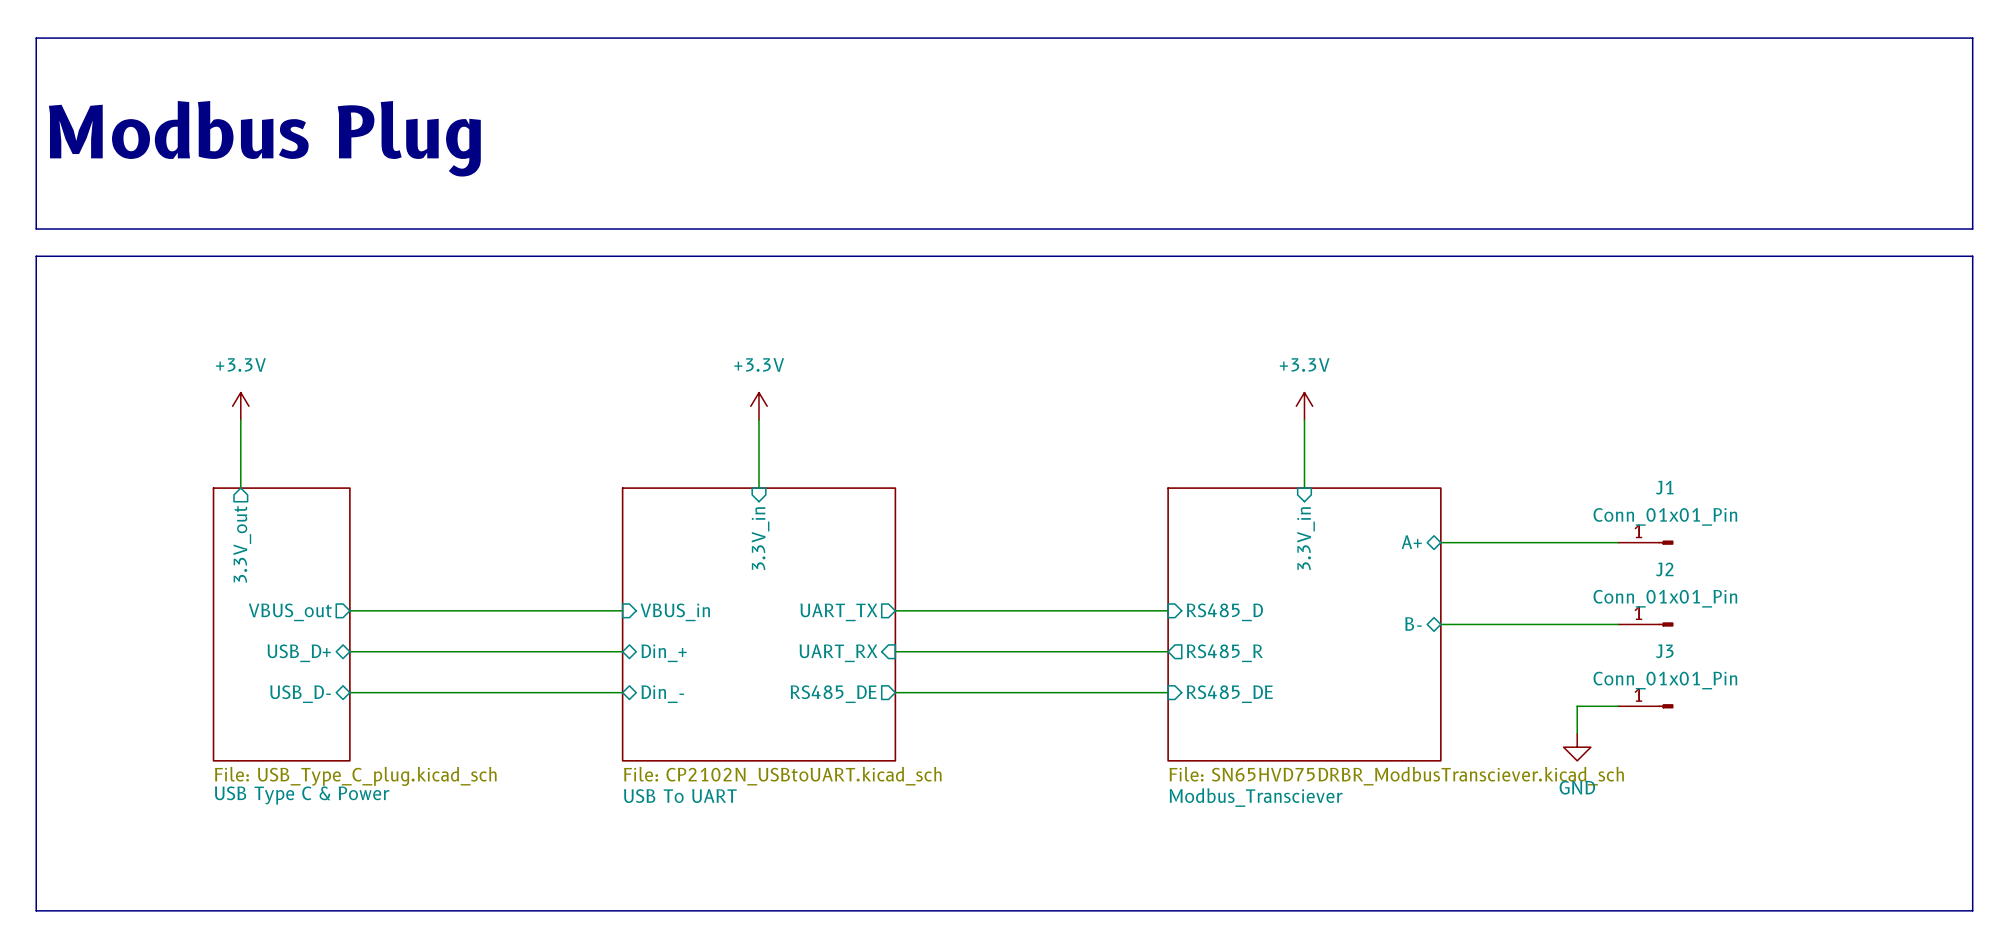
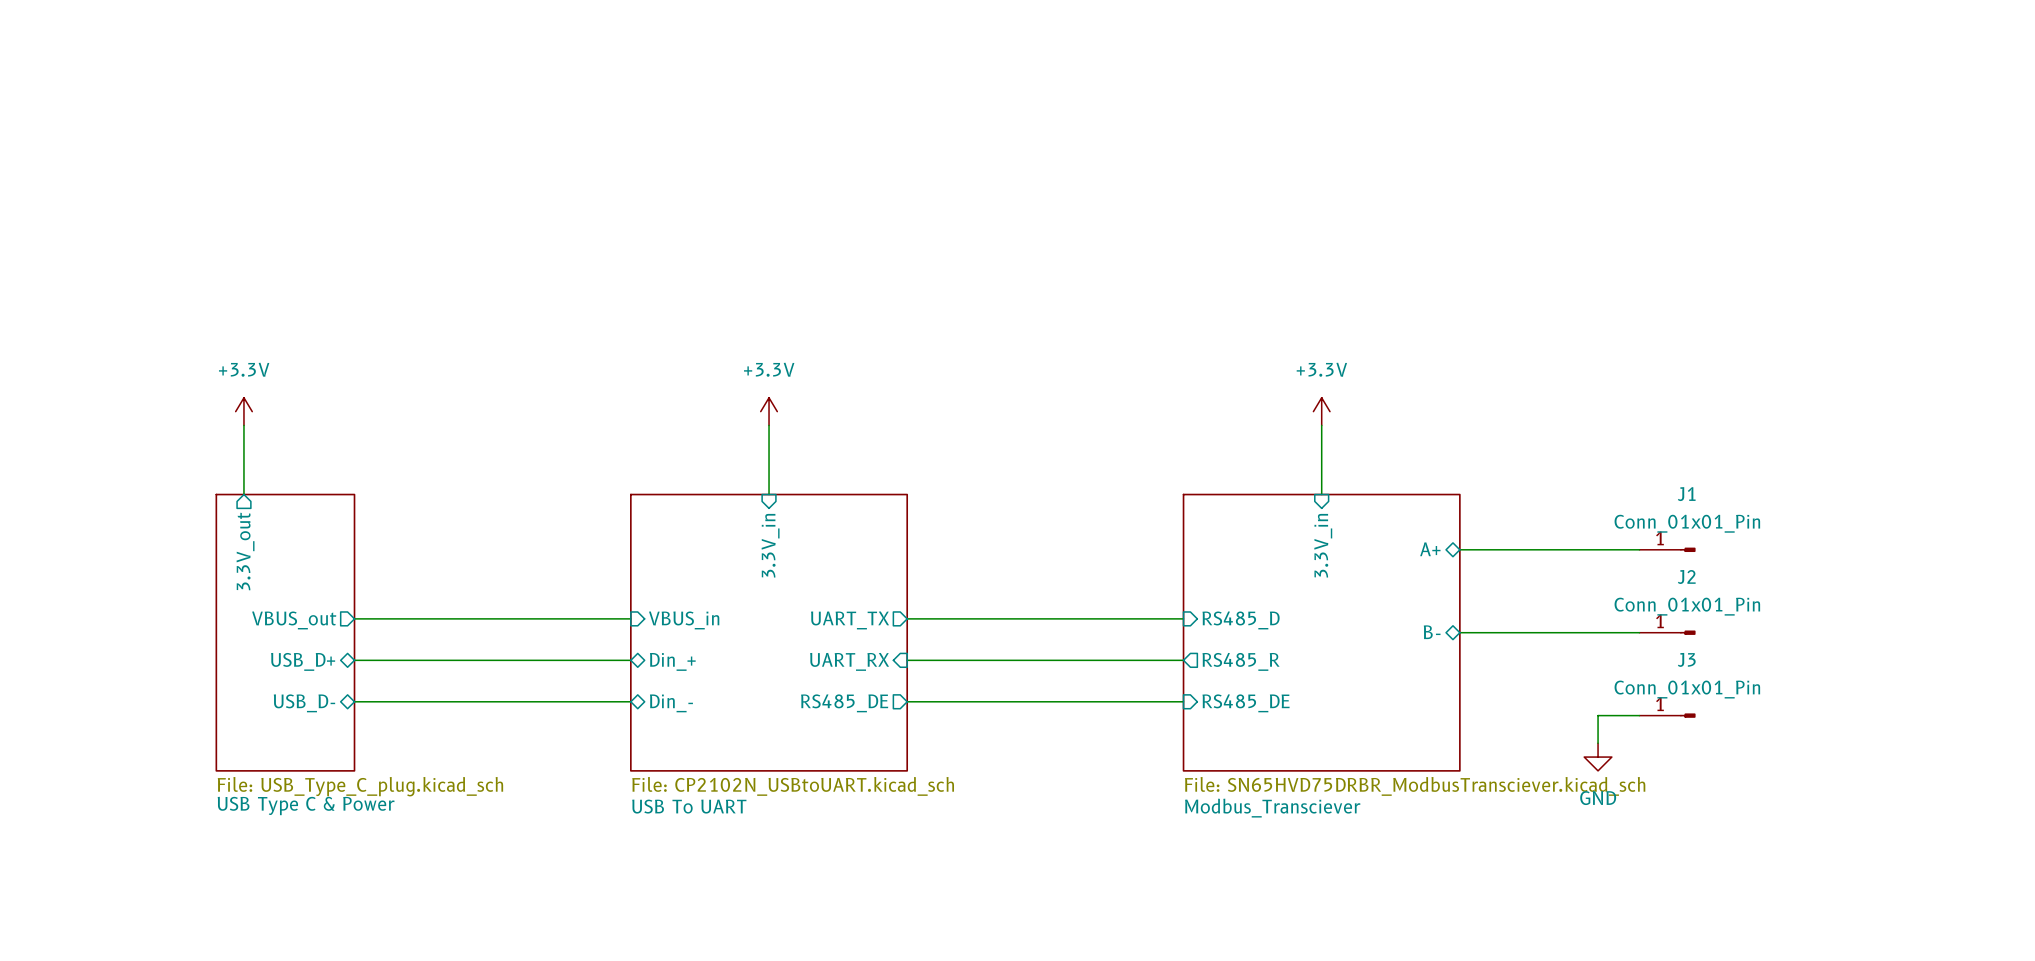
line: (36, 38) (36, 228) (1972, 228) (1972, 38) (36, 38) -> none
text: Modbus Plug (264, 138) -> none
line: (36, 256) (1972, 256) (1972, 910) (36, 910) (36, 256) -> none

